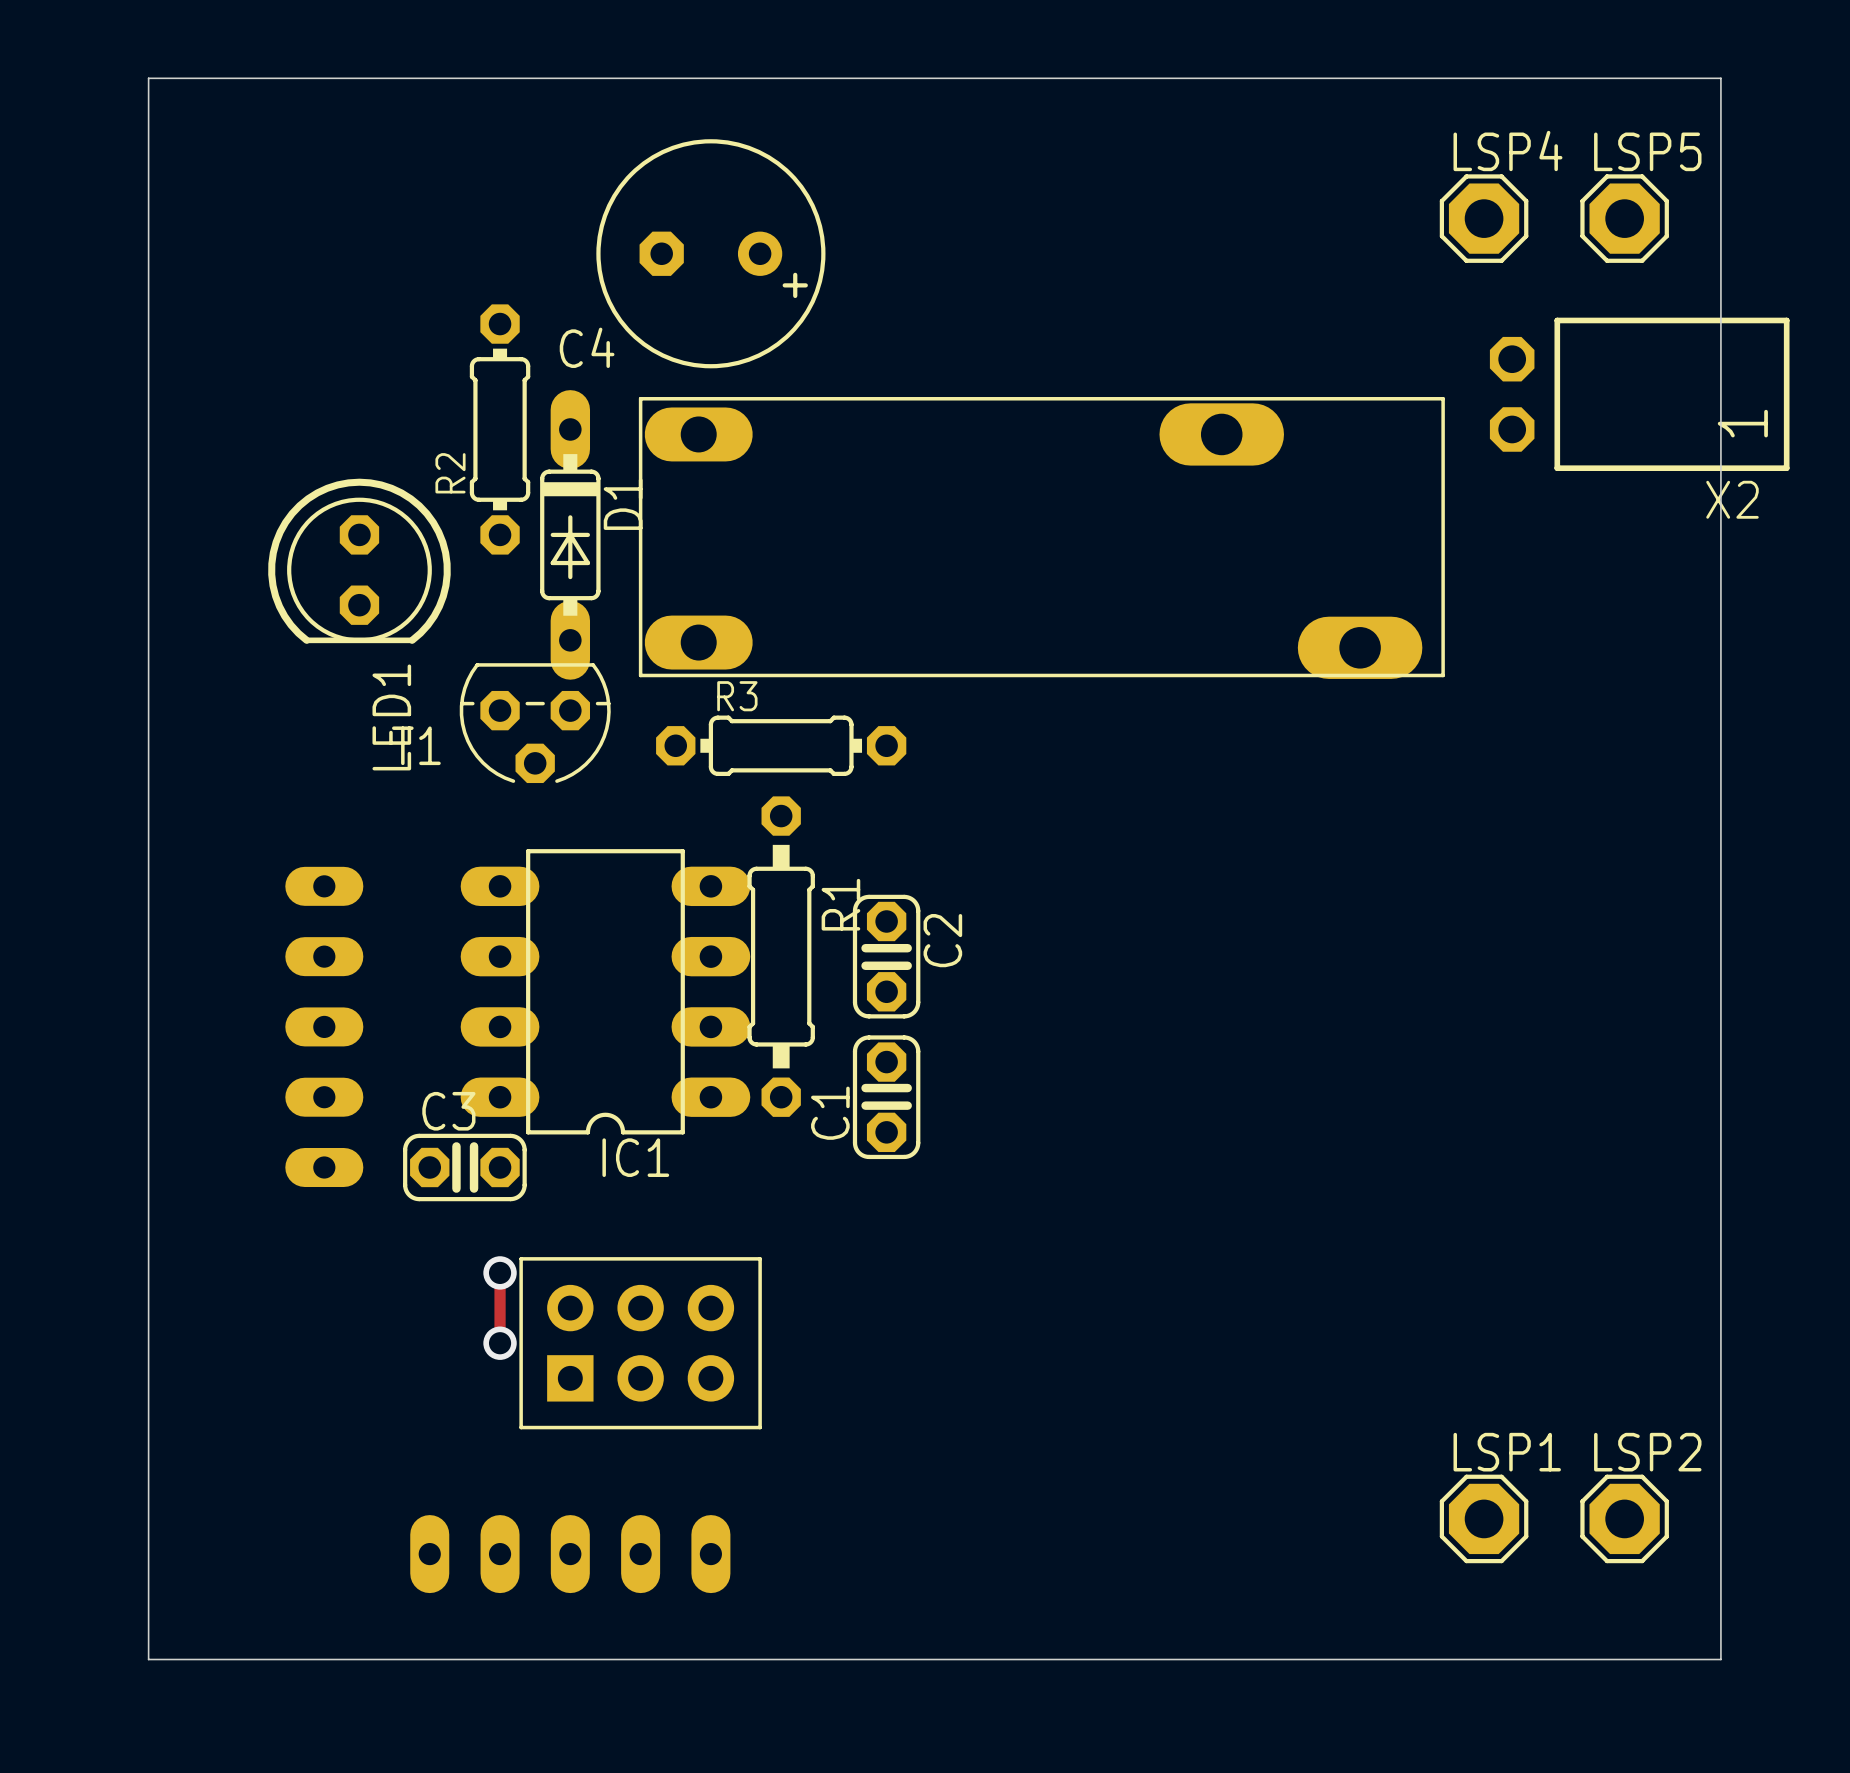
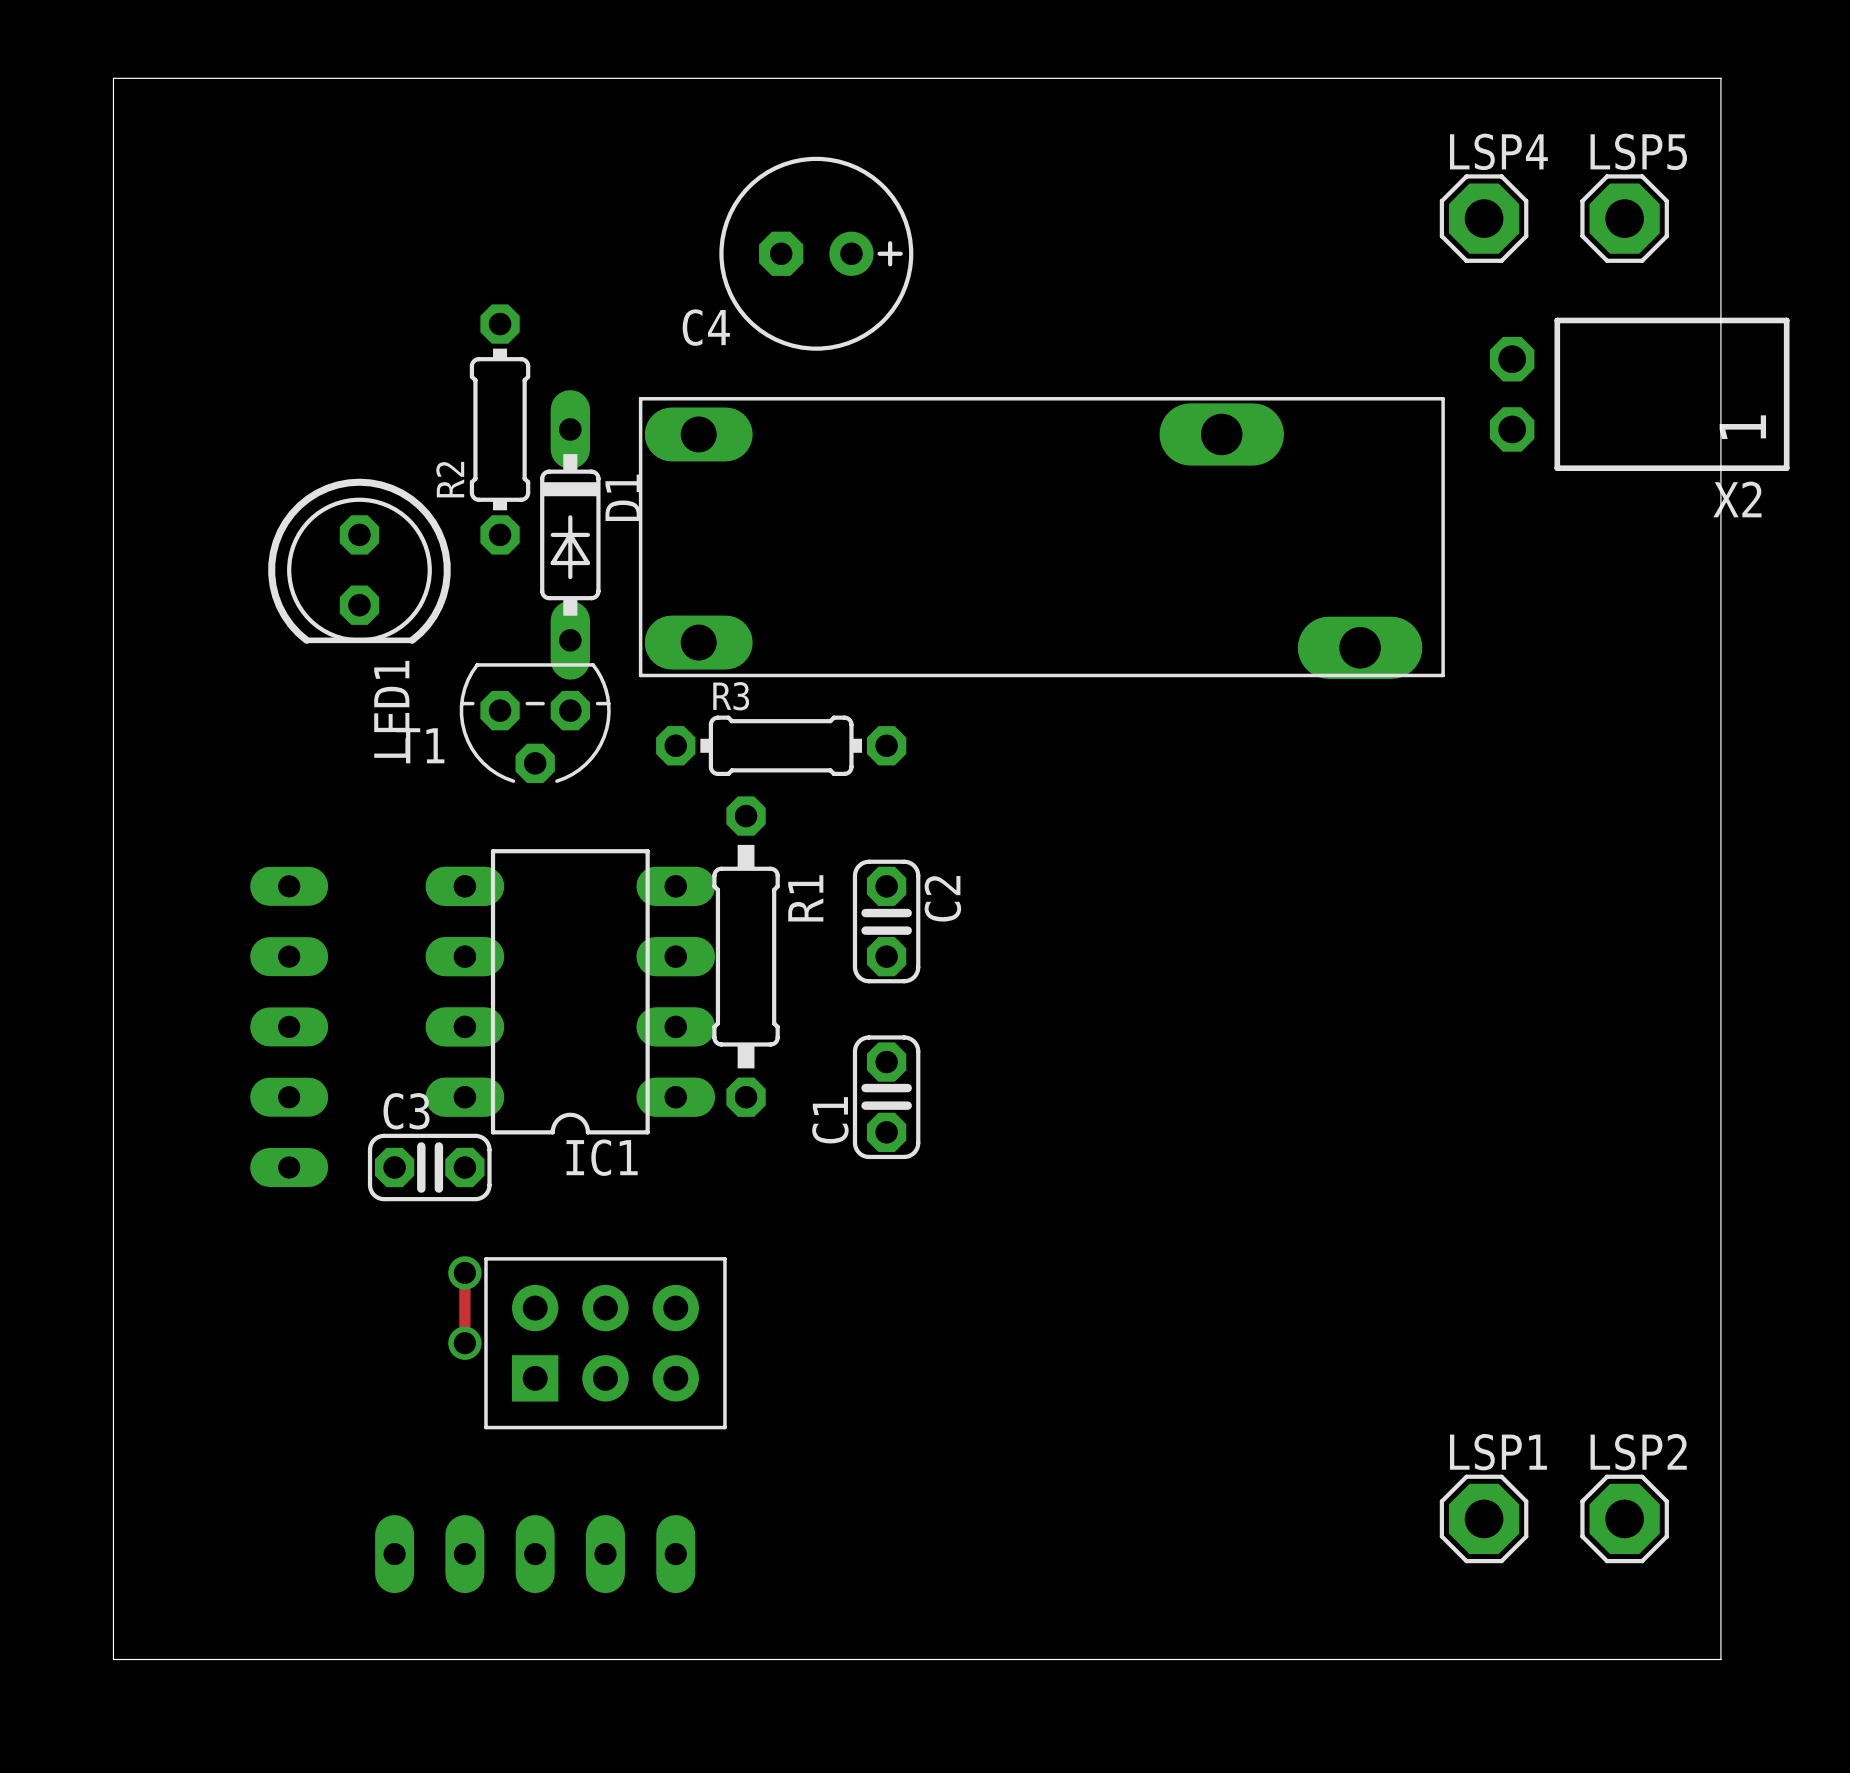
board edge: (148, 78) (148, 1659) -> (148, 78) (113, 78) (113, 1659) (148, 1659)
C4 footprint: [596, 139, 826, 369] -> [719, 156, 914, 351]
R1 position: (781, 956) -> (746, 956)
C2 position: (886, 956) -> (886, 921)
IC1 position: (605, 991) -> (570, 991)
part position: (324, 1026) -> (289, 1026)
C3 position: (464, 1167) -> (429, 1167)
track: (500, 1272) (500, 1343) -> (464, 1272) (464, 1343)
via position: (500, 1272) -> (464, 1272)
via position: (500, 1343) -> (464, 1343)
part position: (640, 1343) -> (605, 1343)
part position: (570, 1554) -> (535, 1554)

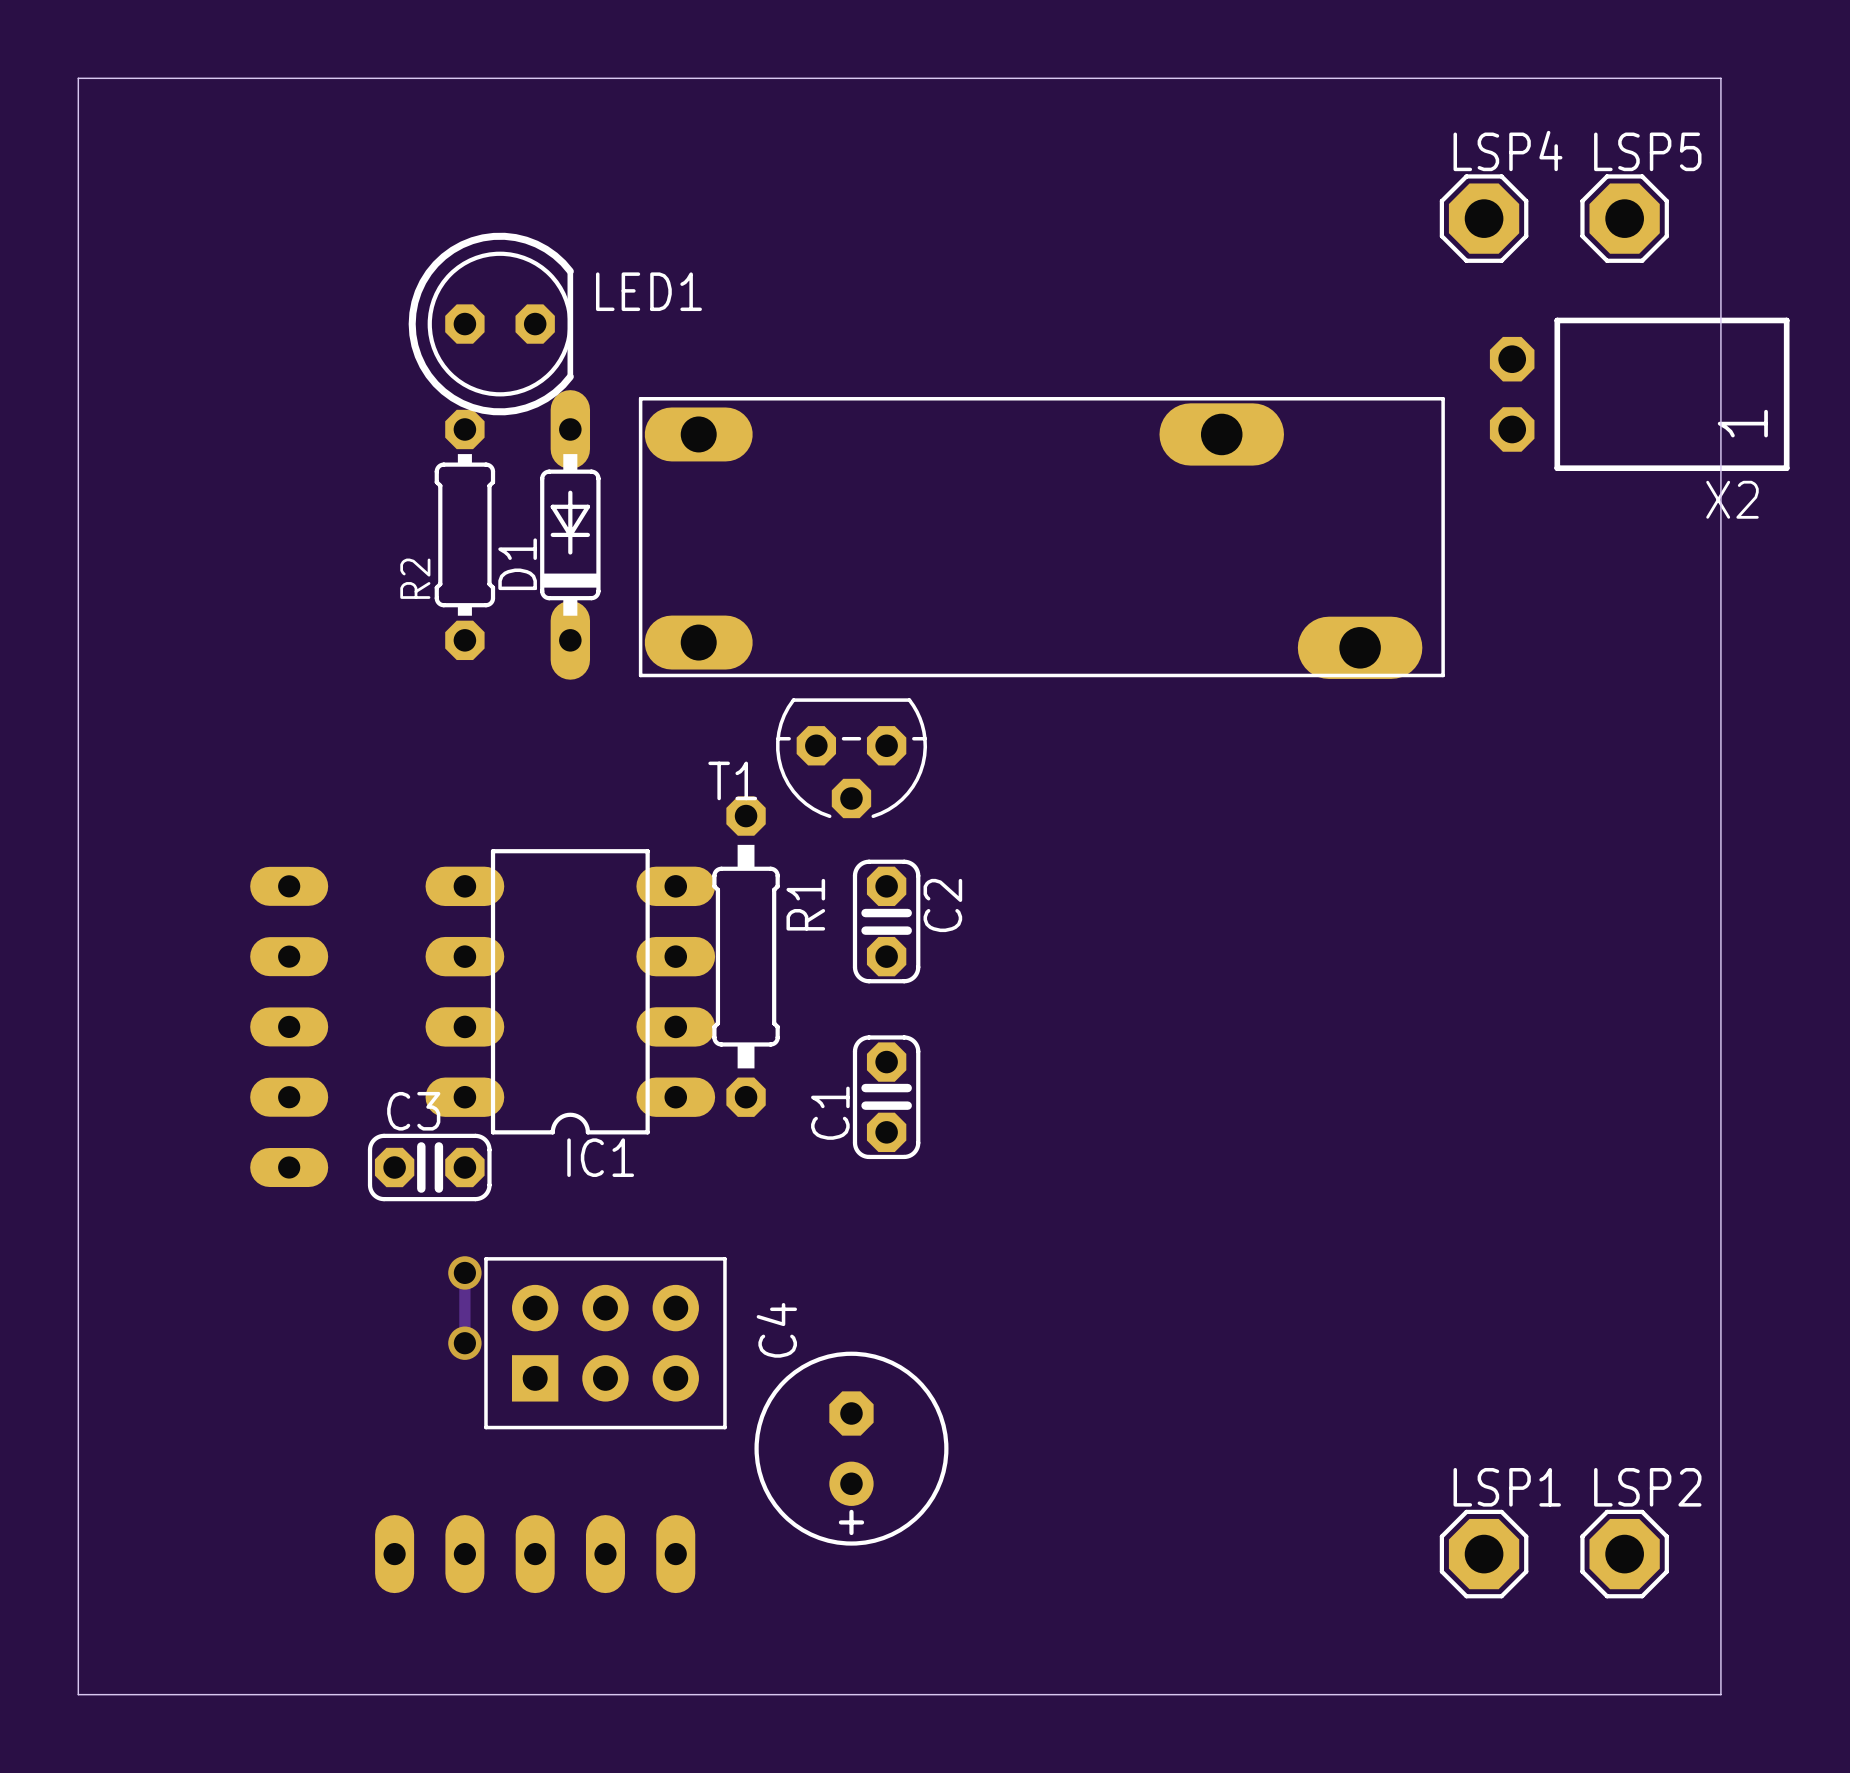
board edge: (113, 78) (113, 1659) (1720, 1659) -> (113, 78) (78, 78) (78, 1694) (1720, 1694) (1720, 1659)
C4 rotation: 0° (816, 253) -> 90° clockwise (851, 1448)
C4 position: (816, 253) -> (851, 1448)
R2 position: (500, 429) -> (464, 534)
D1 rotation: 0° (570, 534) -> 180° (570, 534)
LED1 rotation: 0° (359, 561) -> 90° counterclockwise (491, 324)
LED1 position: (359, 561) -> (491, 324)
T1 position: (535, 723) -> (851, 758)
R3: (781, 745) -> none
LSP1 position: (1484, 1518) -> (1484, 1554)
LSP2 position: (1624, 1518) -> (1624, 1554)

